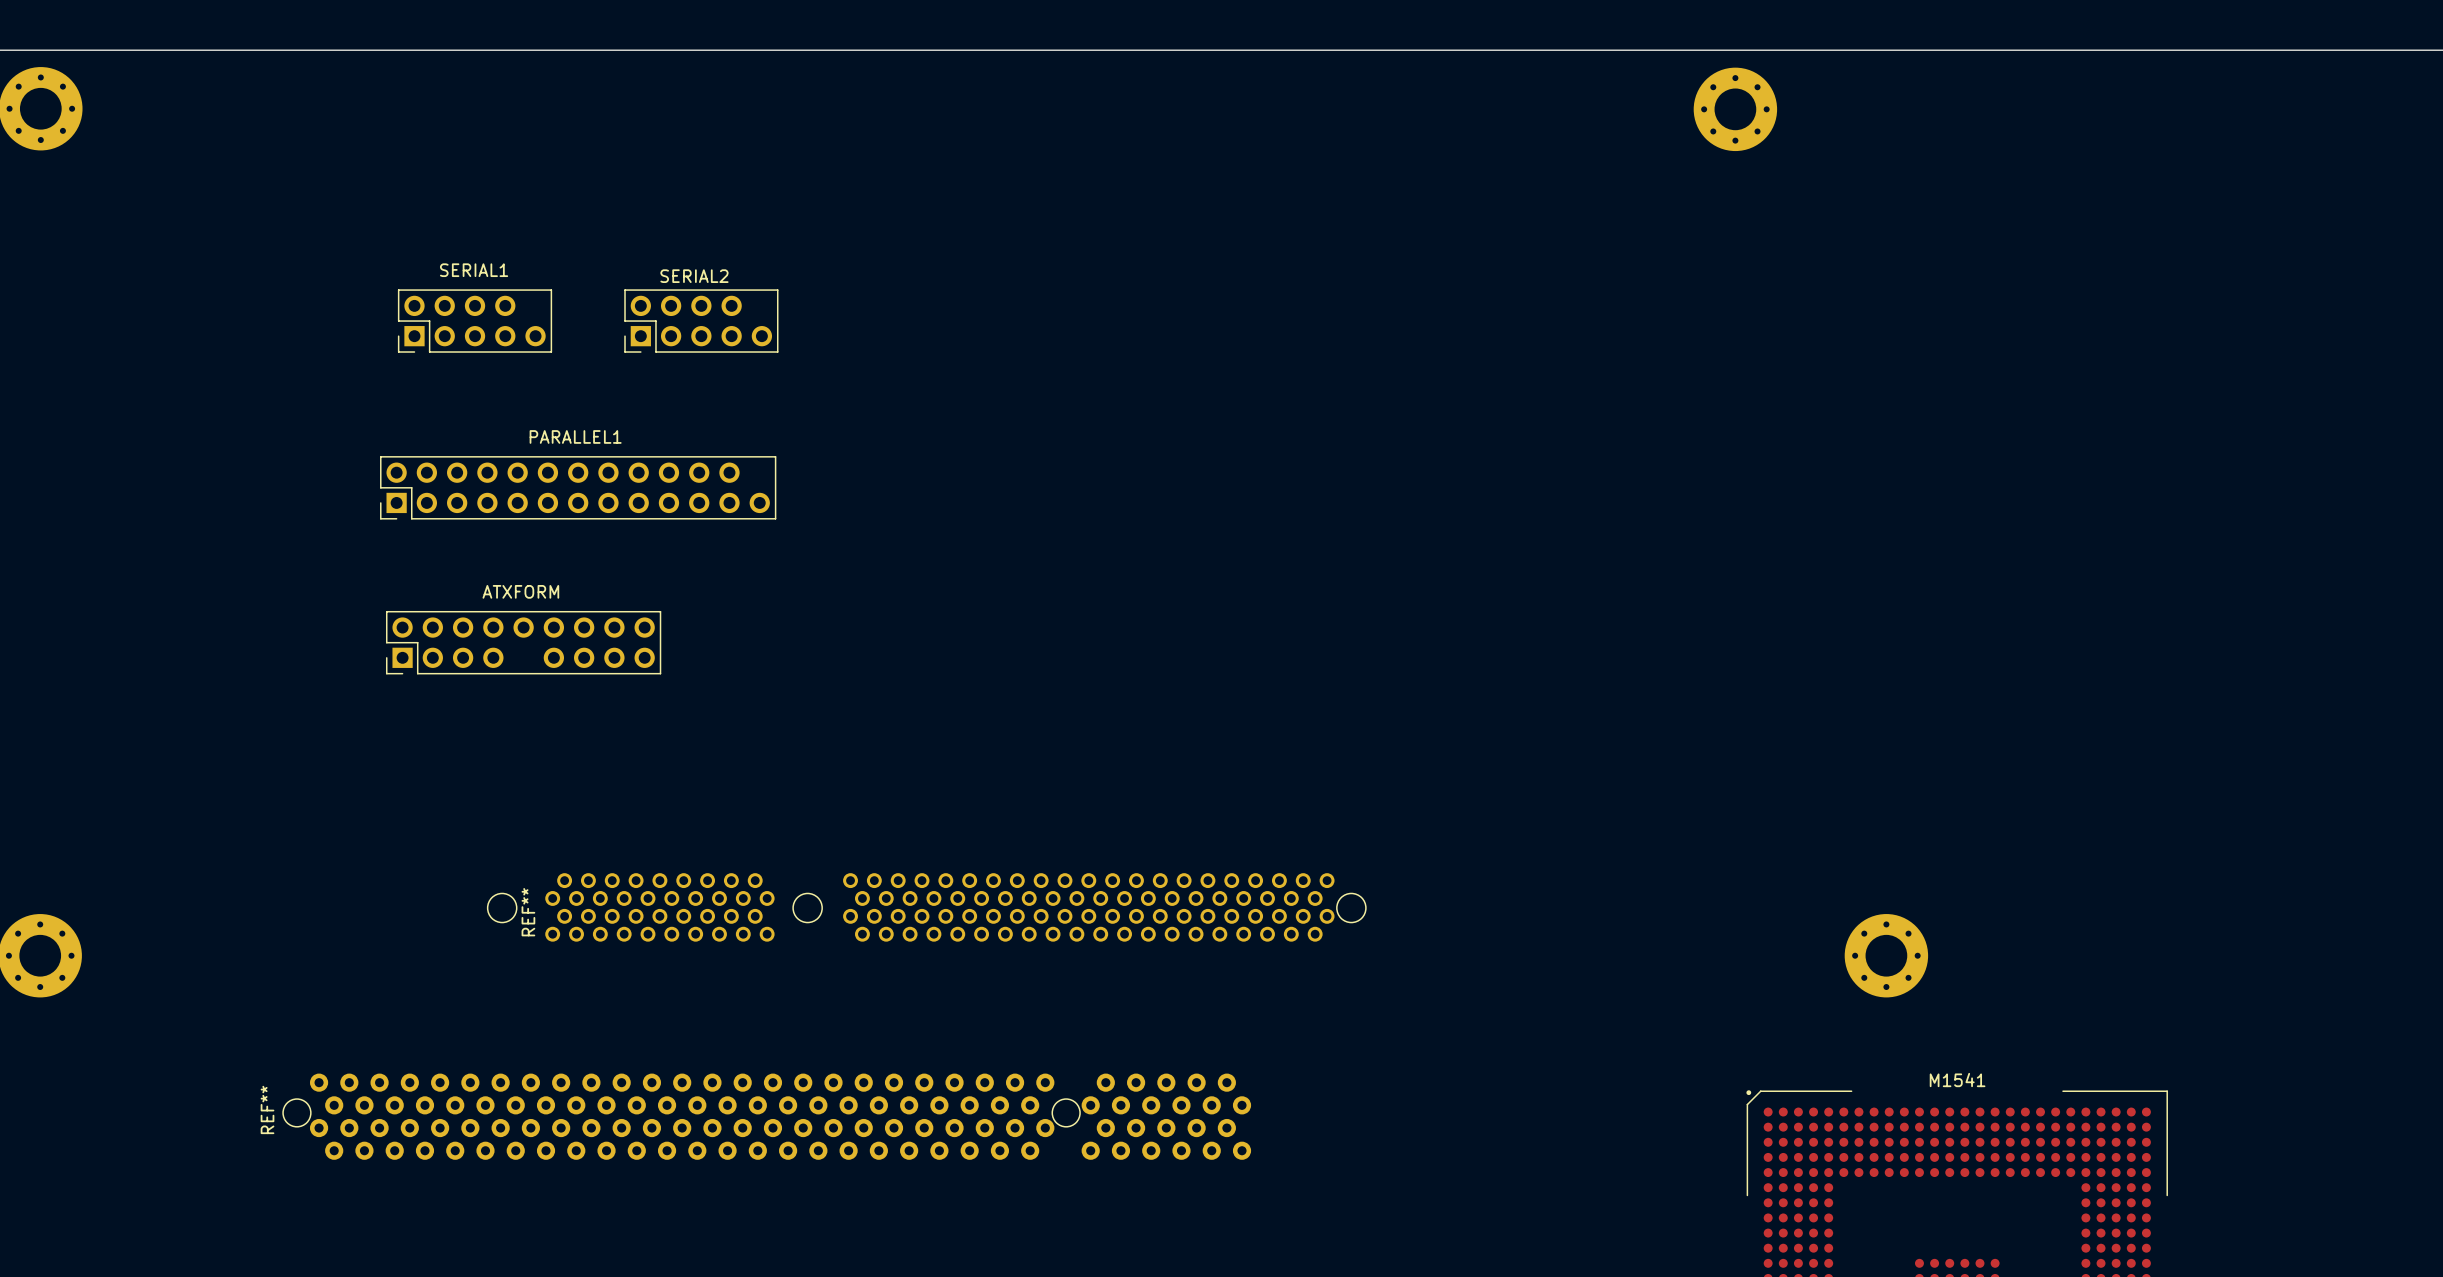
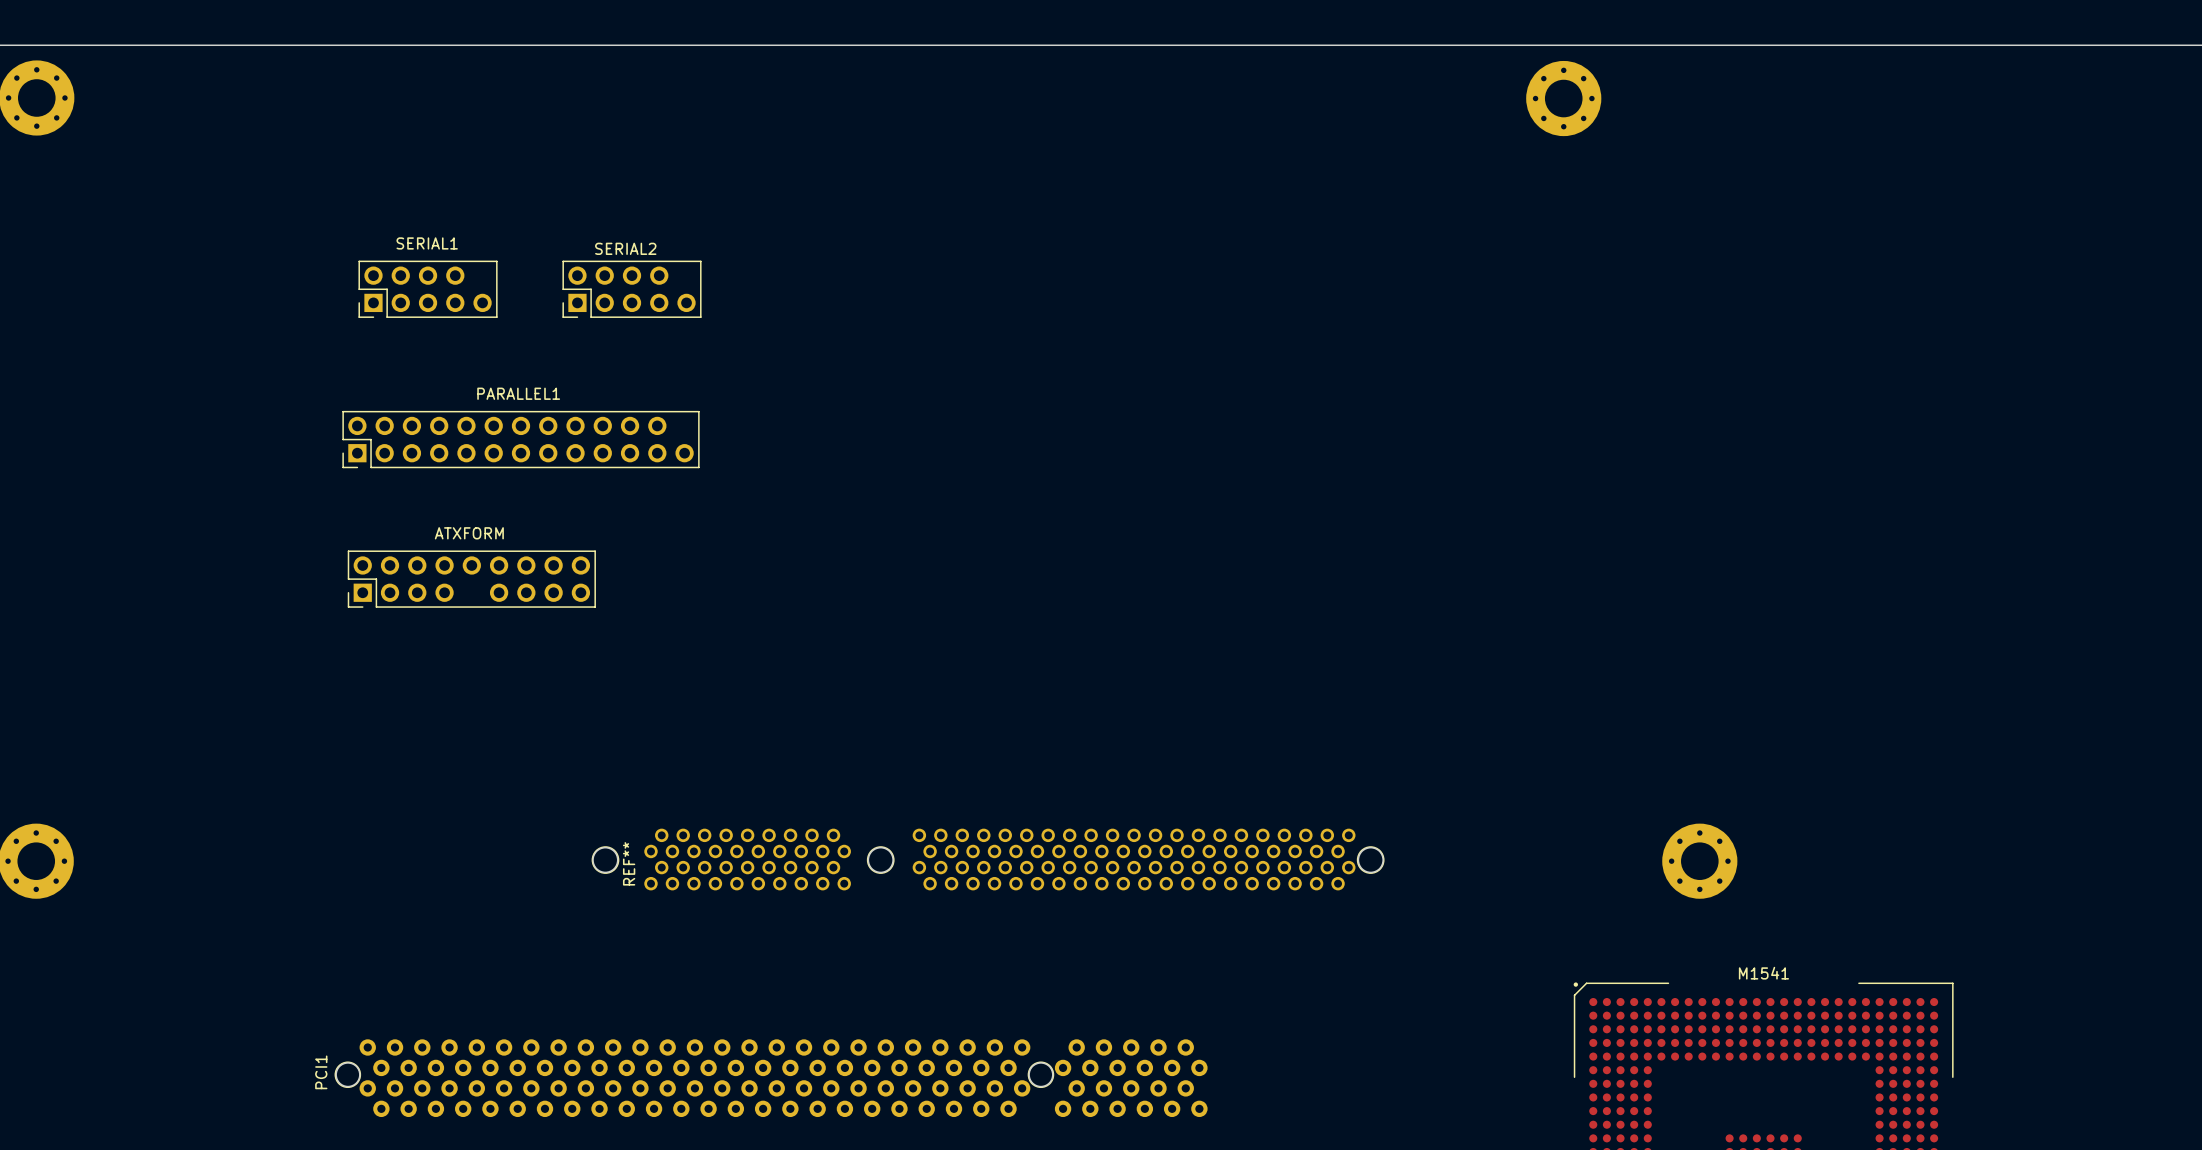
REF** position: (926, 907) -> (988, 859)
round board edge: none -> [592, 847, 619, 873]
round board edge: none -> [868, 847, 894, 873]
round board edge: none -> [1358, 847, 1384, 873]
REF**: (766, 1116) -> none
round board edge: none -> [335, 1062, 361, 1087]
round board edge: none -> [1028, 1062, 1054, 1087]
PCI1: none -> (771, 1078)

